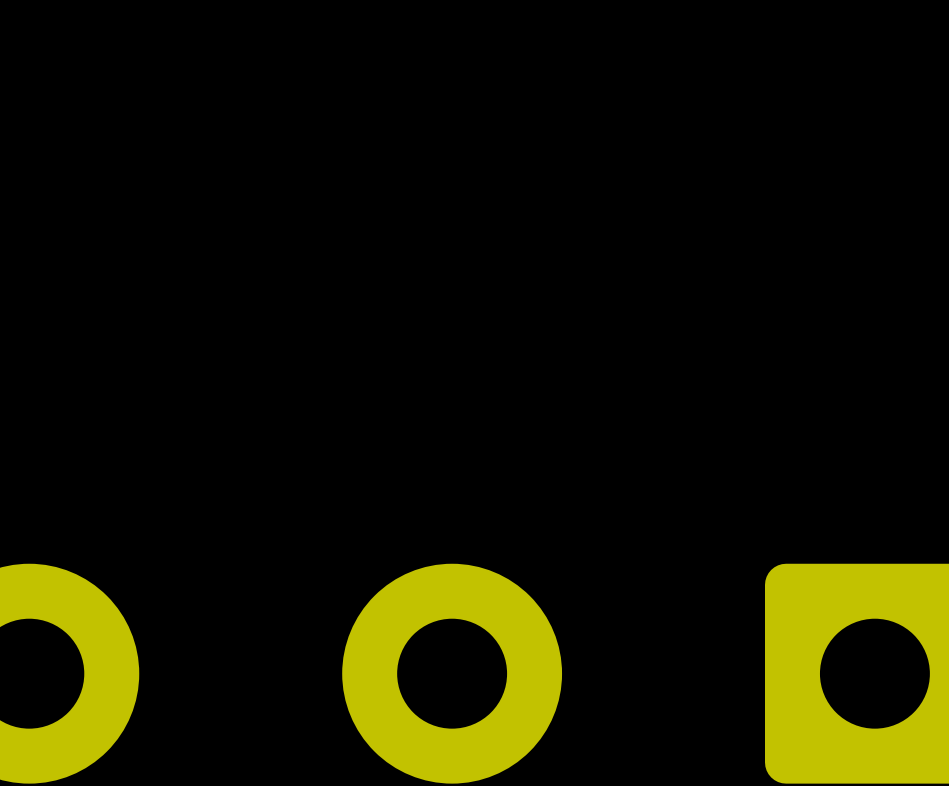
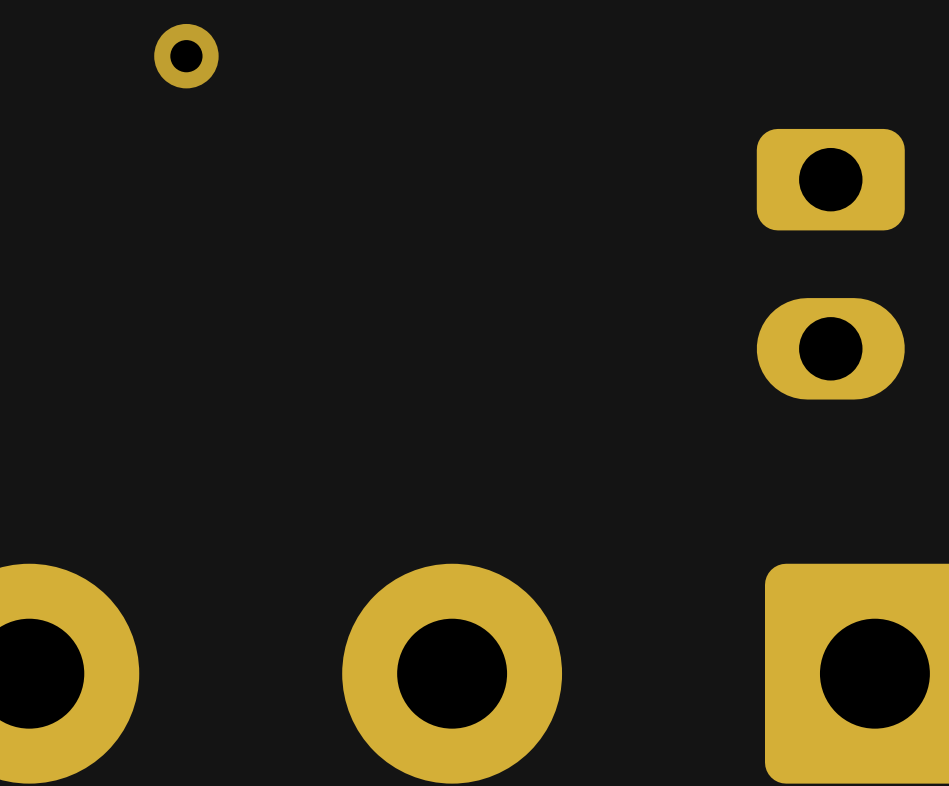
via: none -> (186, 56)
part: none -> (830, 264)

